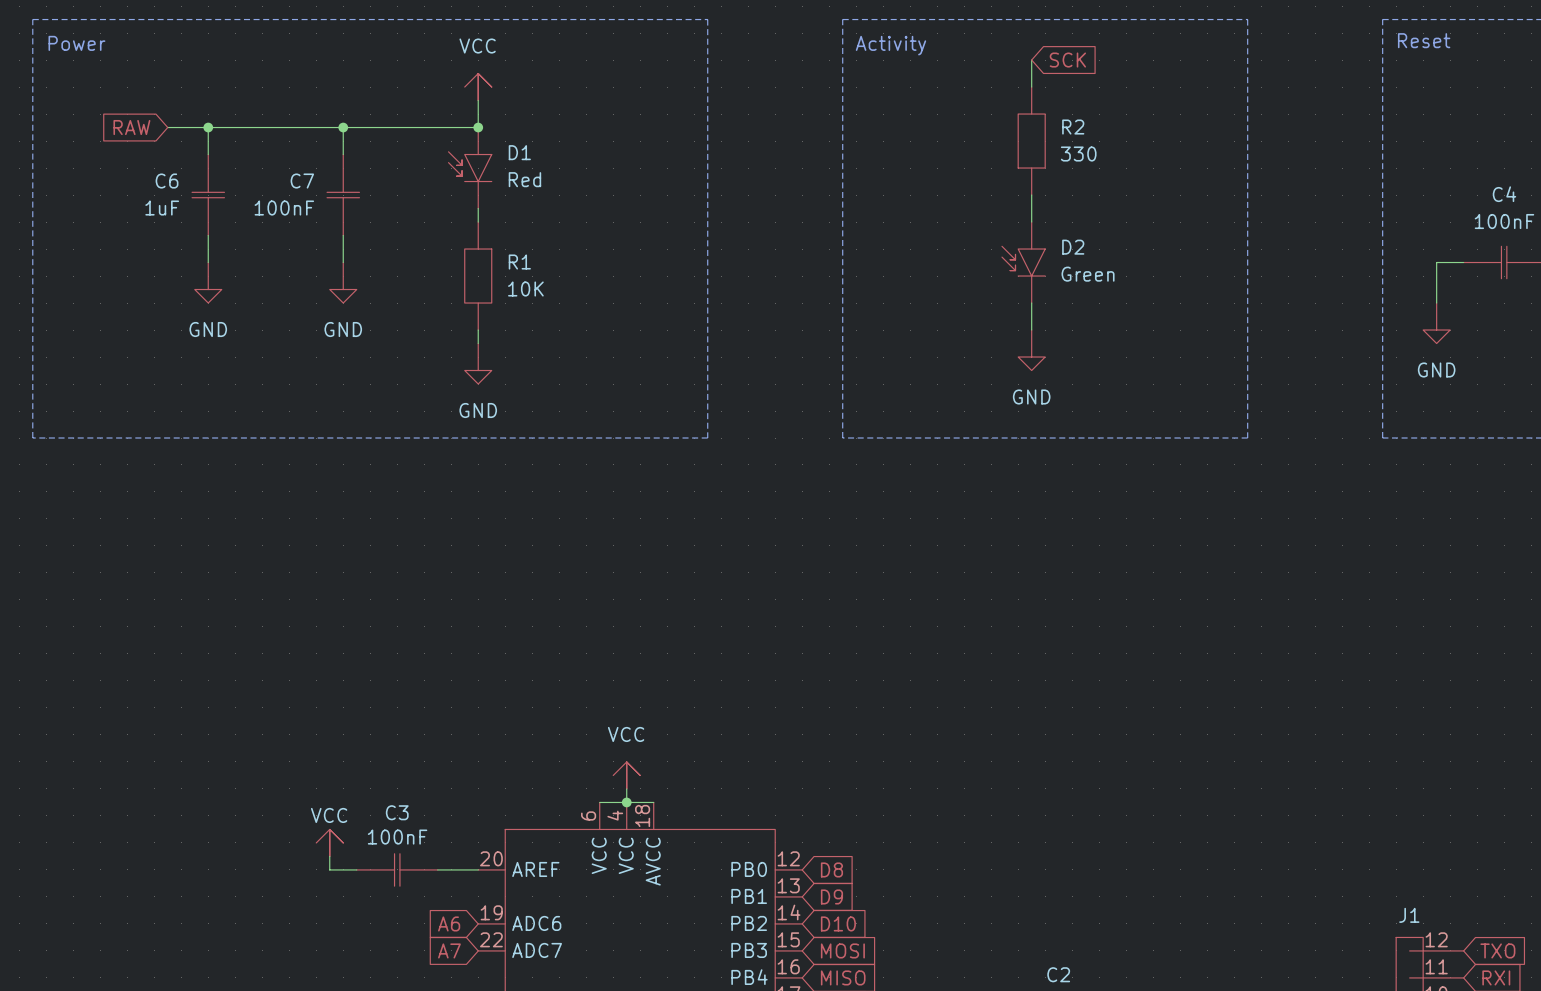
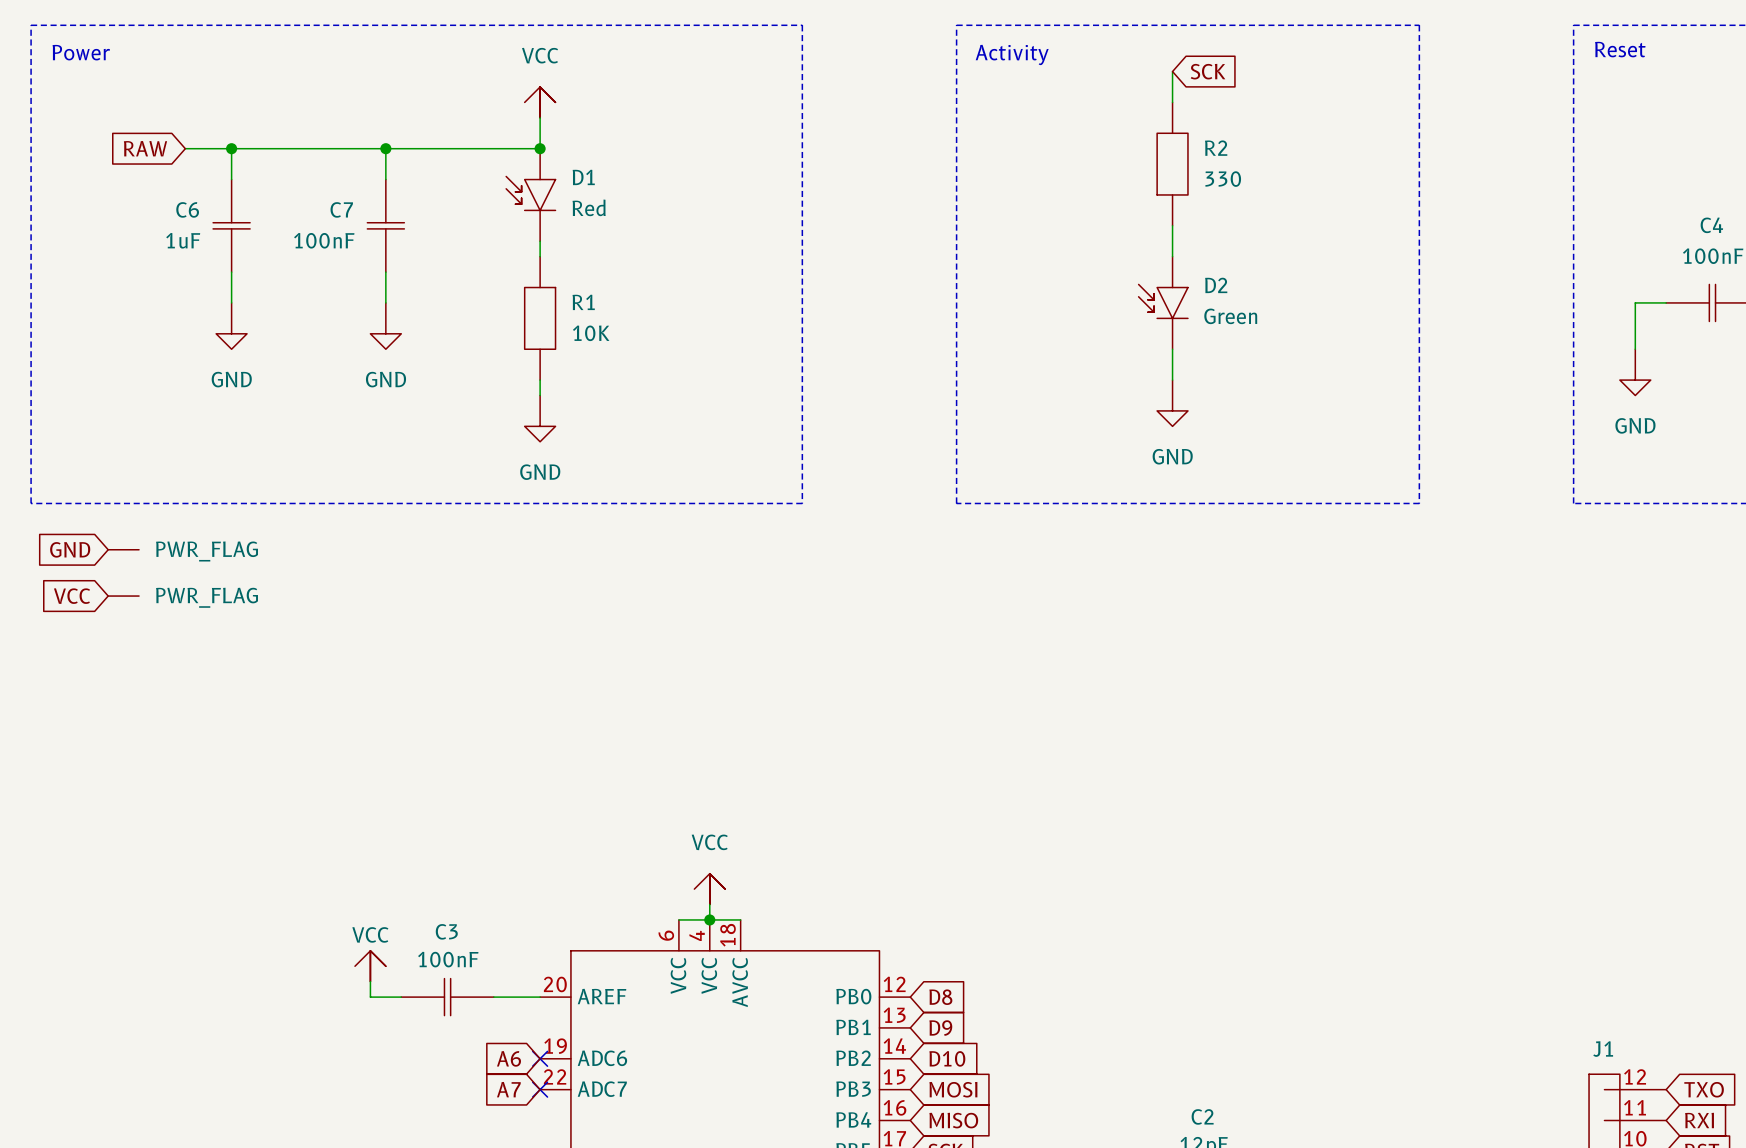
global label: none -> GND (70, 549)
power symbol: none -> PWR_FLAG (123, 549)
global label: none -> VCC (72, 596)
power symbol: none -> PWR_FLAG (123, 596)
no-connect mark: none -> (540, 1058)
no-connect mark: none -> (540, 1089)

